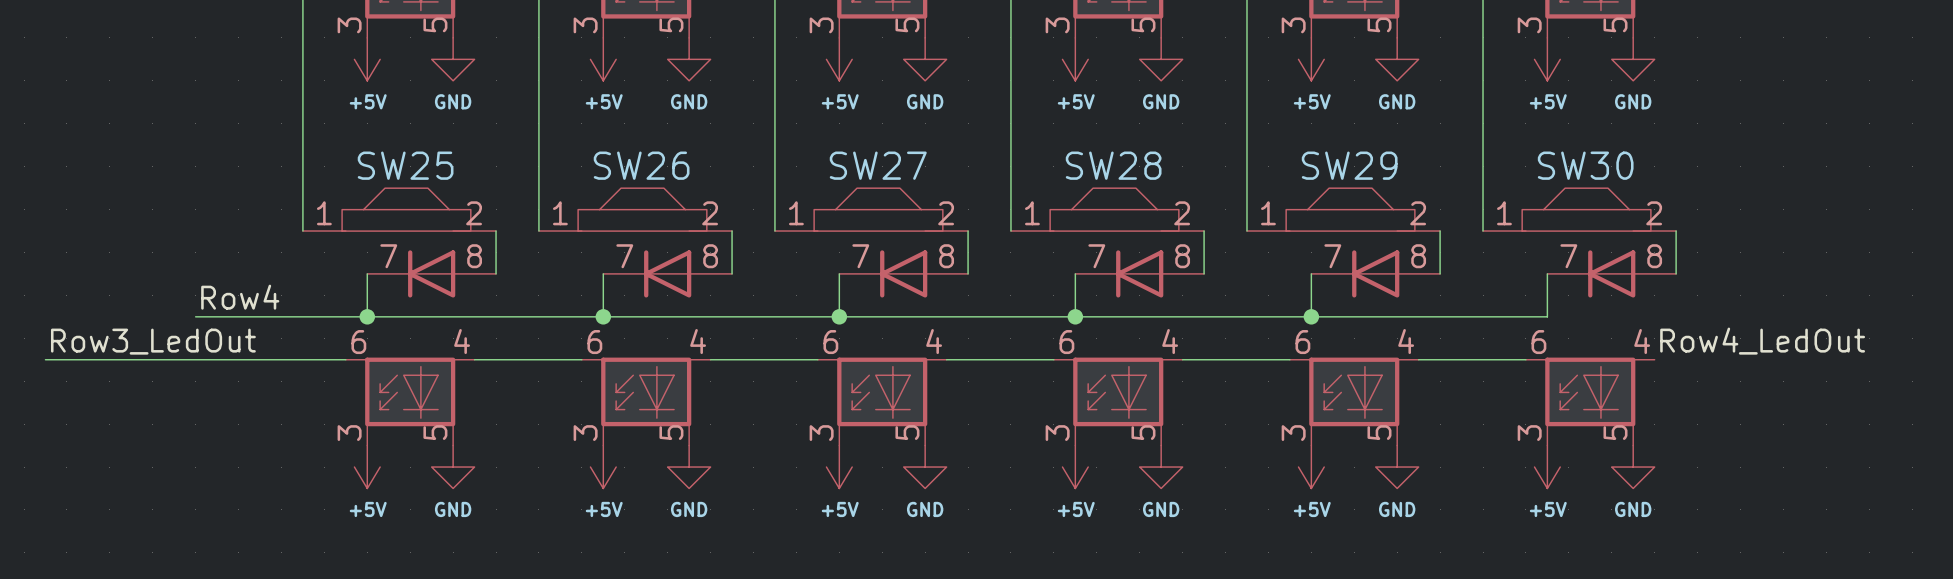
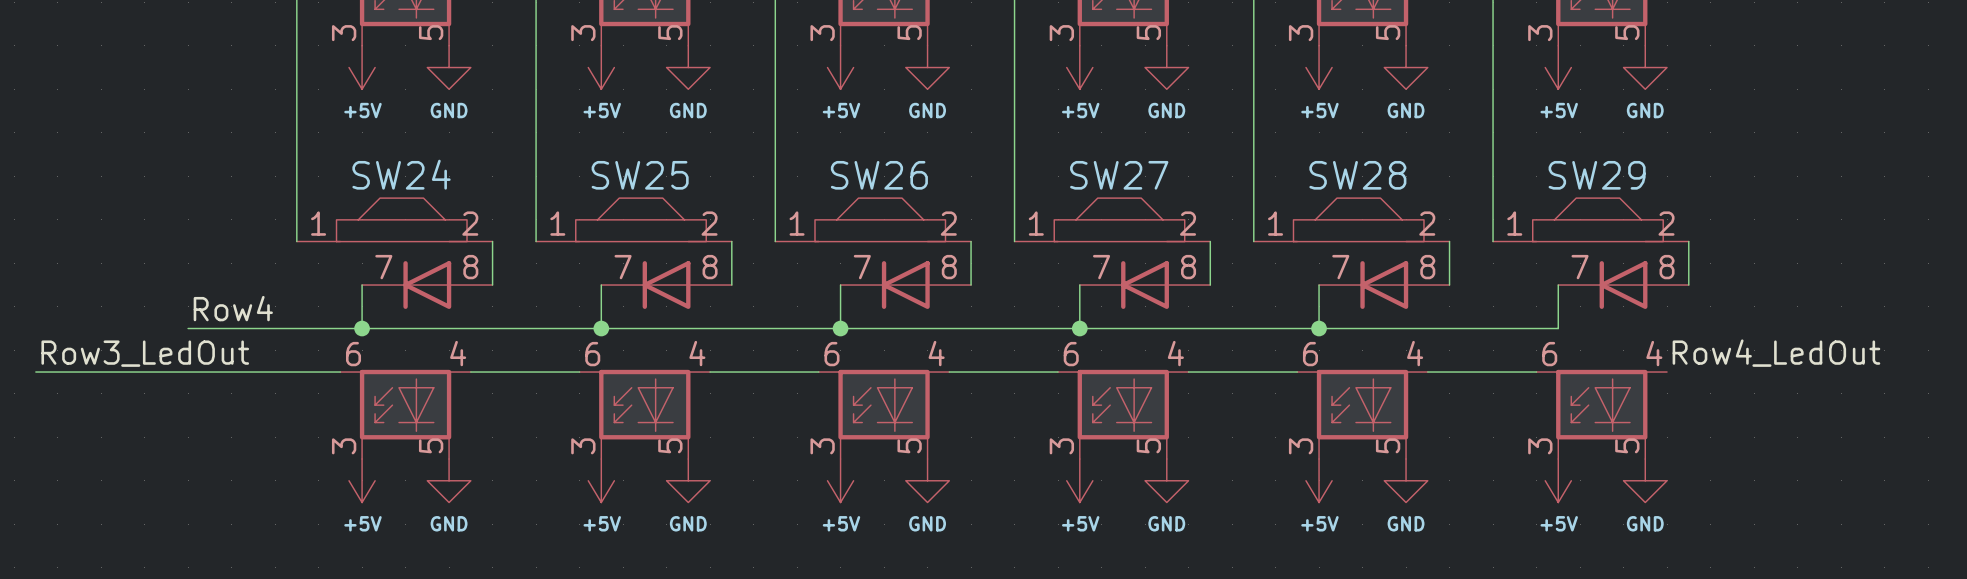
SW25 name: SW25 (405, 165) -> SW24 (401, 174)
SW26 name: SW26 (641, 165) -> SW25 (640, 175)
SW27 name: SW27 (878, 165) -> SW26 (879, 175)
SW28 name: SW28 (1113, 165) -> SW27 (1119, 175)
SW29 name: SW29 (1349, 165) -> SW28 (1357, 175)
SW30 name: SW30 (1585, 165) -> SW29 (1597, 175)

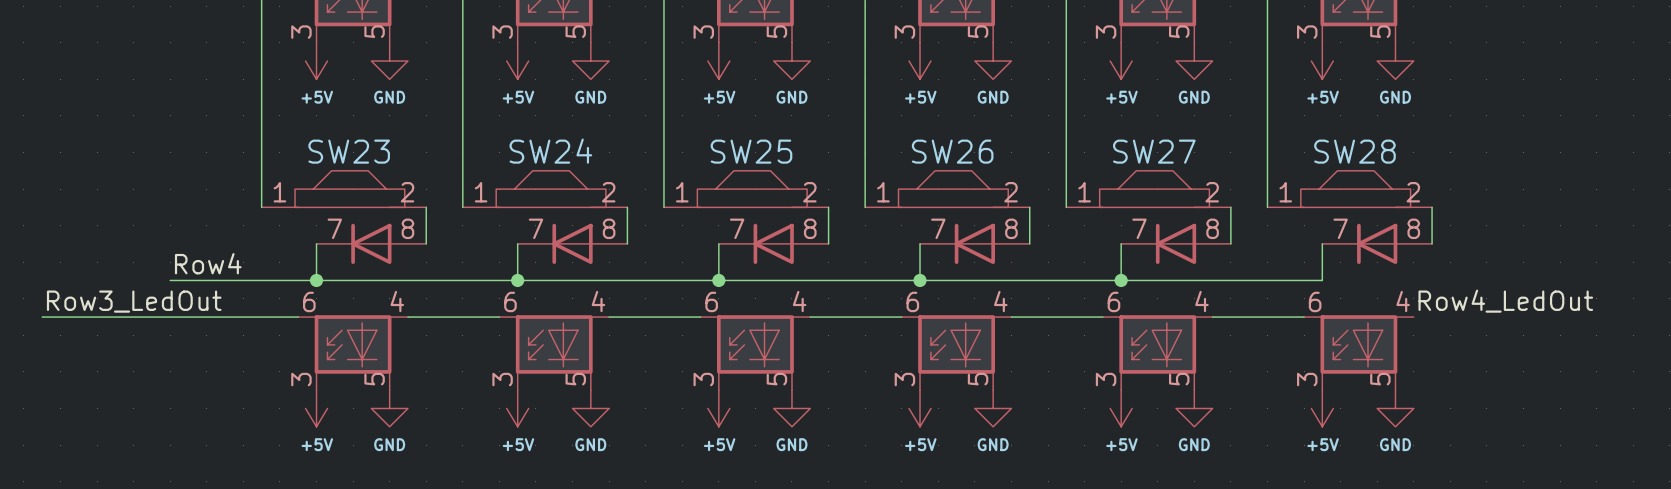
SW24 name: SW24 (401, 174) -> SW23 (349, 151)
SW25 name: SW25 (640, 175) -> SW24 (550, 151)
SW26 name: SW26 (879, 175) -> SW25 (751, 151)
SW27 name: SW27 (1119, 175) -> SW26 (952, 151)
SW28 name: SW28 (1357, 175) -> SW27 (1154, 151)
SW29 name: SW29 (1597, 175) -> SW28 (1354, 151)

